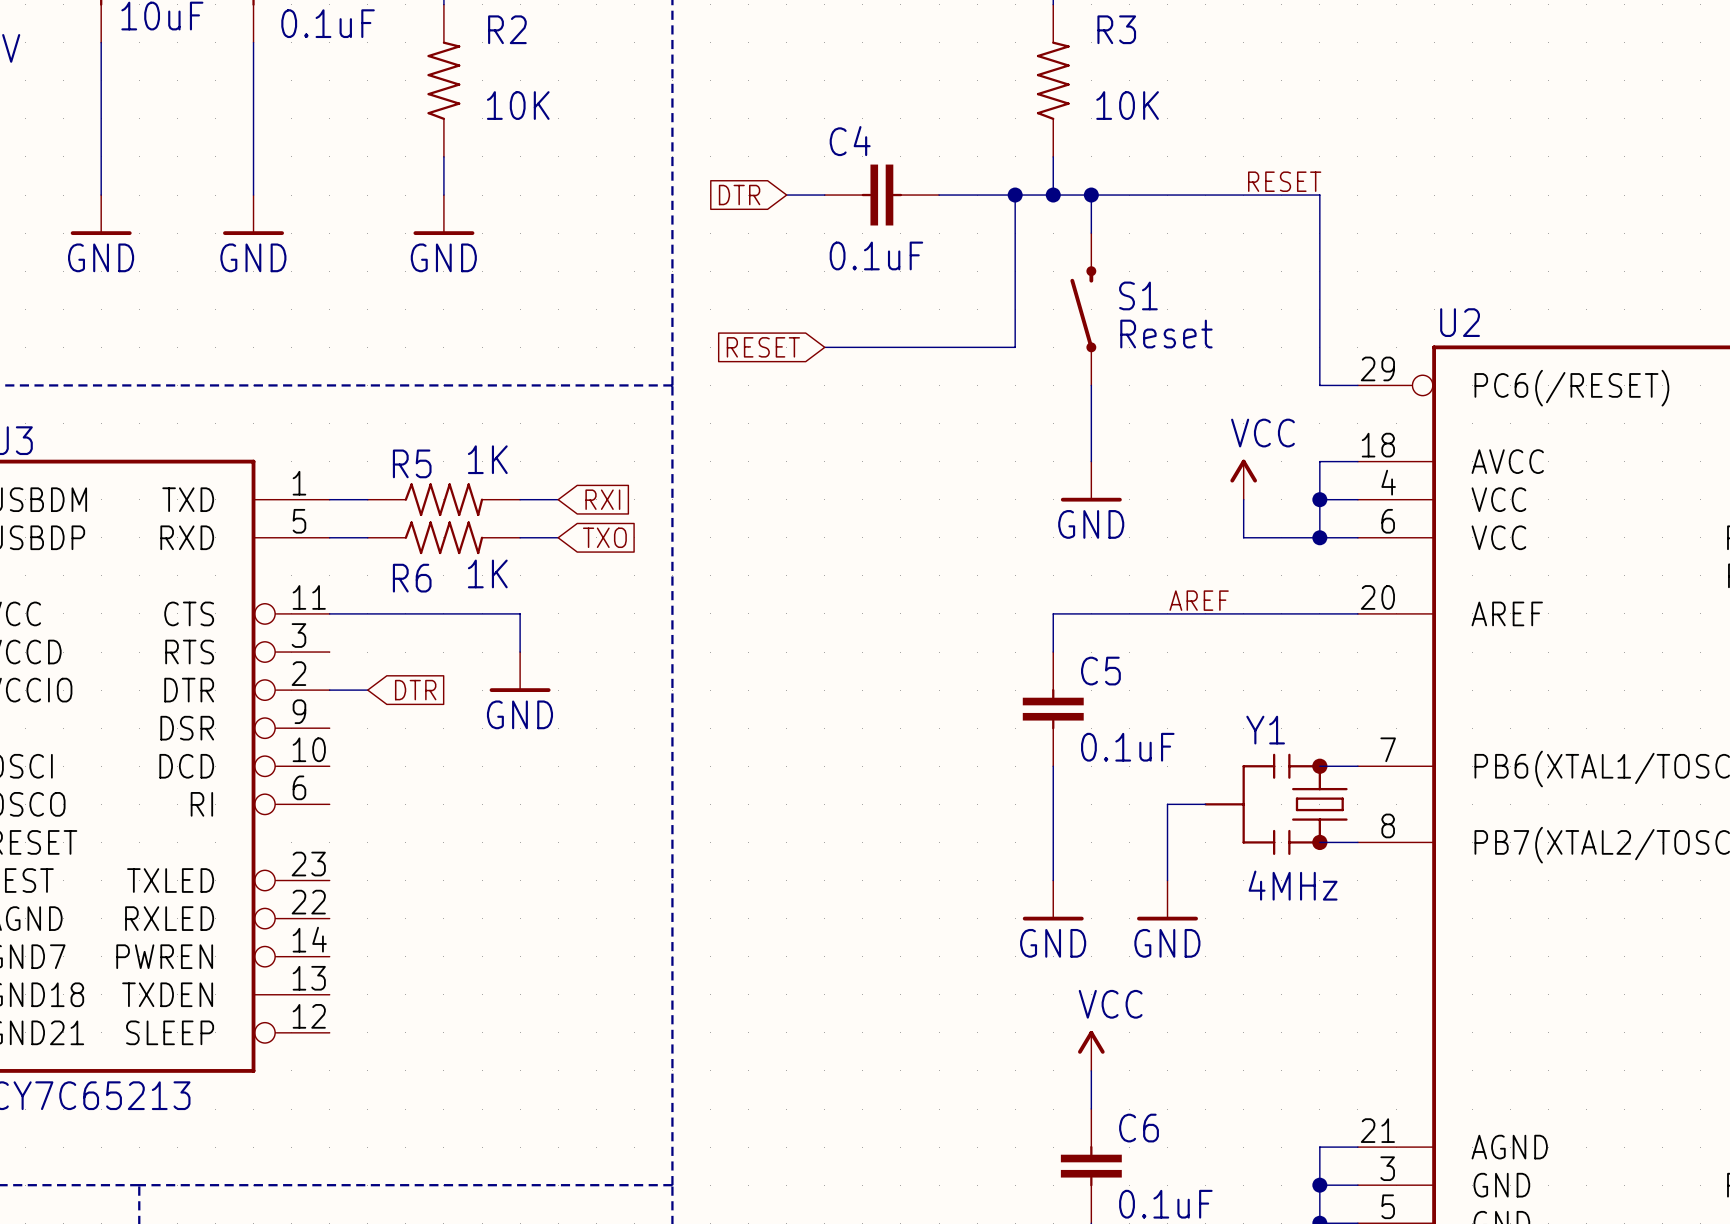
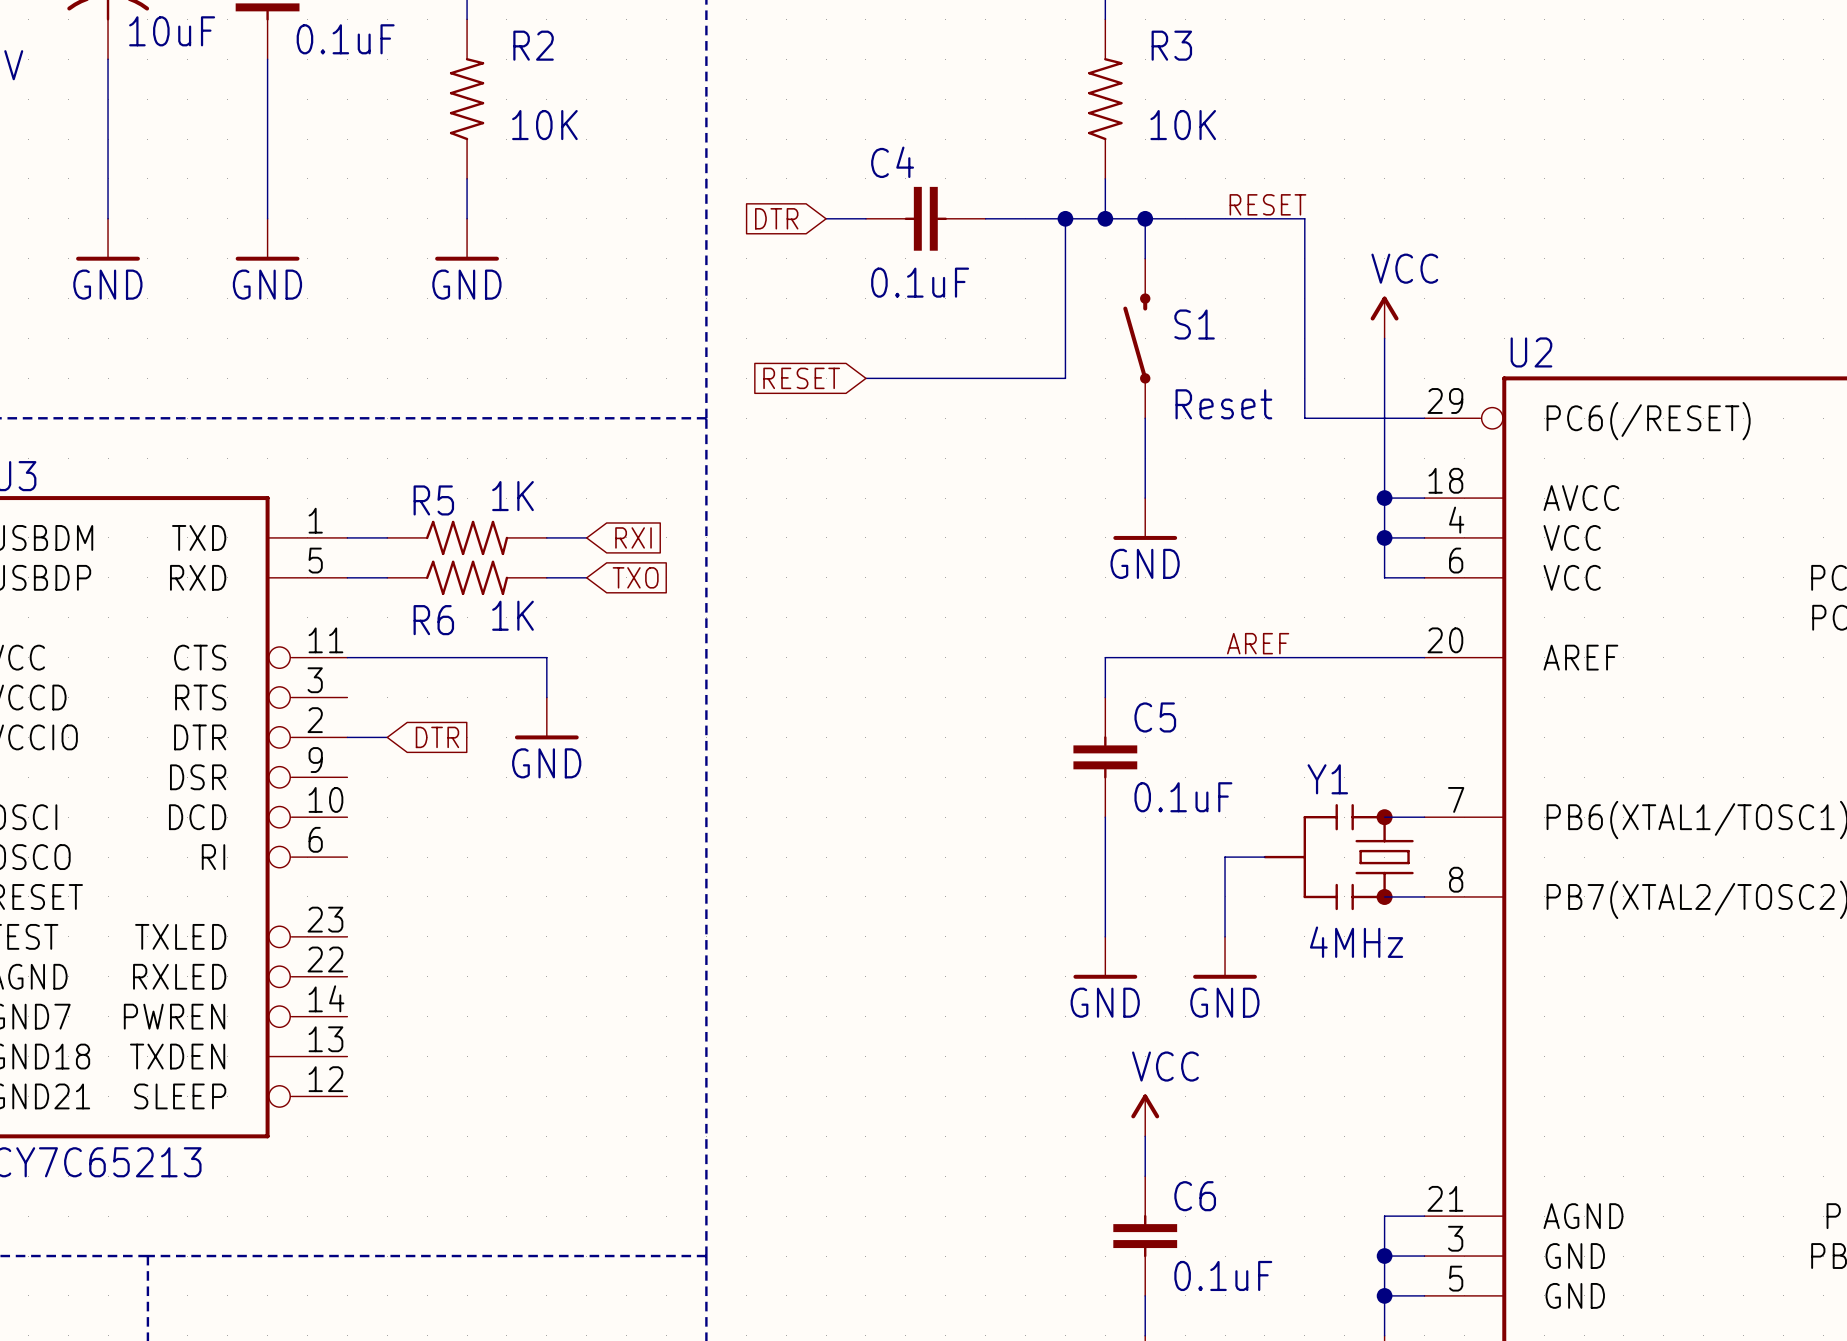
label position: RESET (1284, 181) -> RESET (1267, 204)
wire: (1243, 195) (1319, 195) (1319, 309) -> (1304, 218) (1304, 418) (1384, 418) (1384, 498)
S1 text position: Reset (1166, 334) -> Reset (1223, 404)
power symbol position: VCC (1243, 479) -> VCC (1384, 317)
wire: (1243, 499) (1243, 537) (1319, 537) -> none
junction position: (1319, 537) -> (1384, 498)

